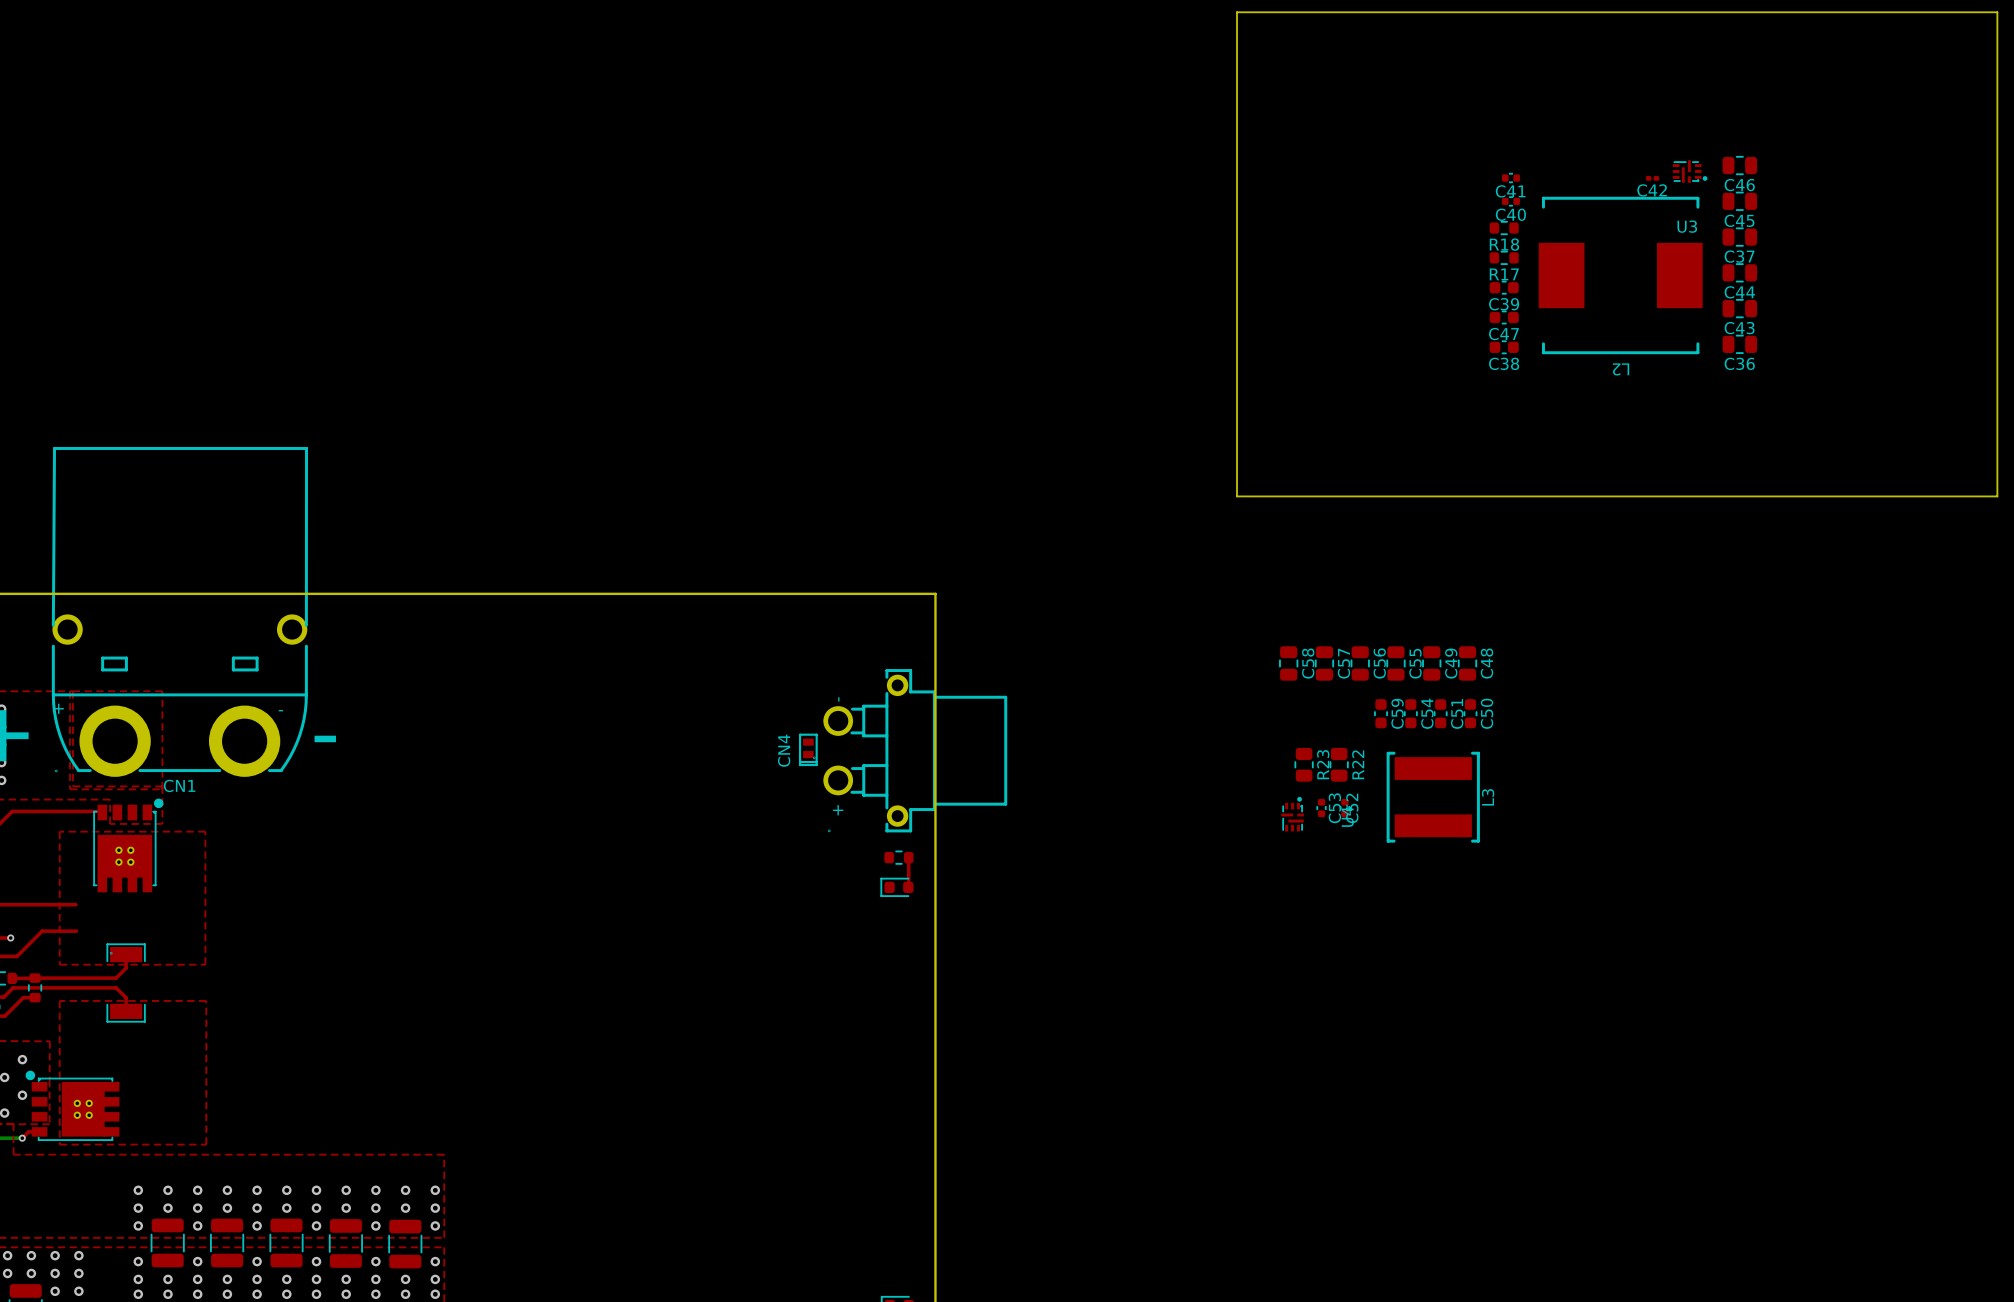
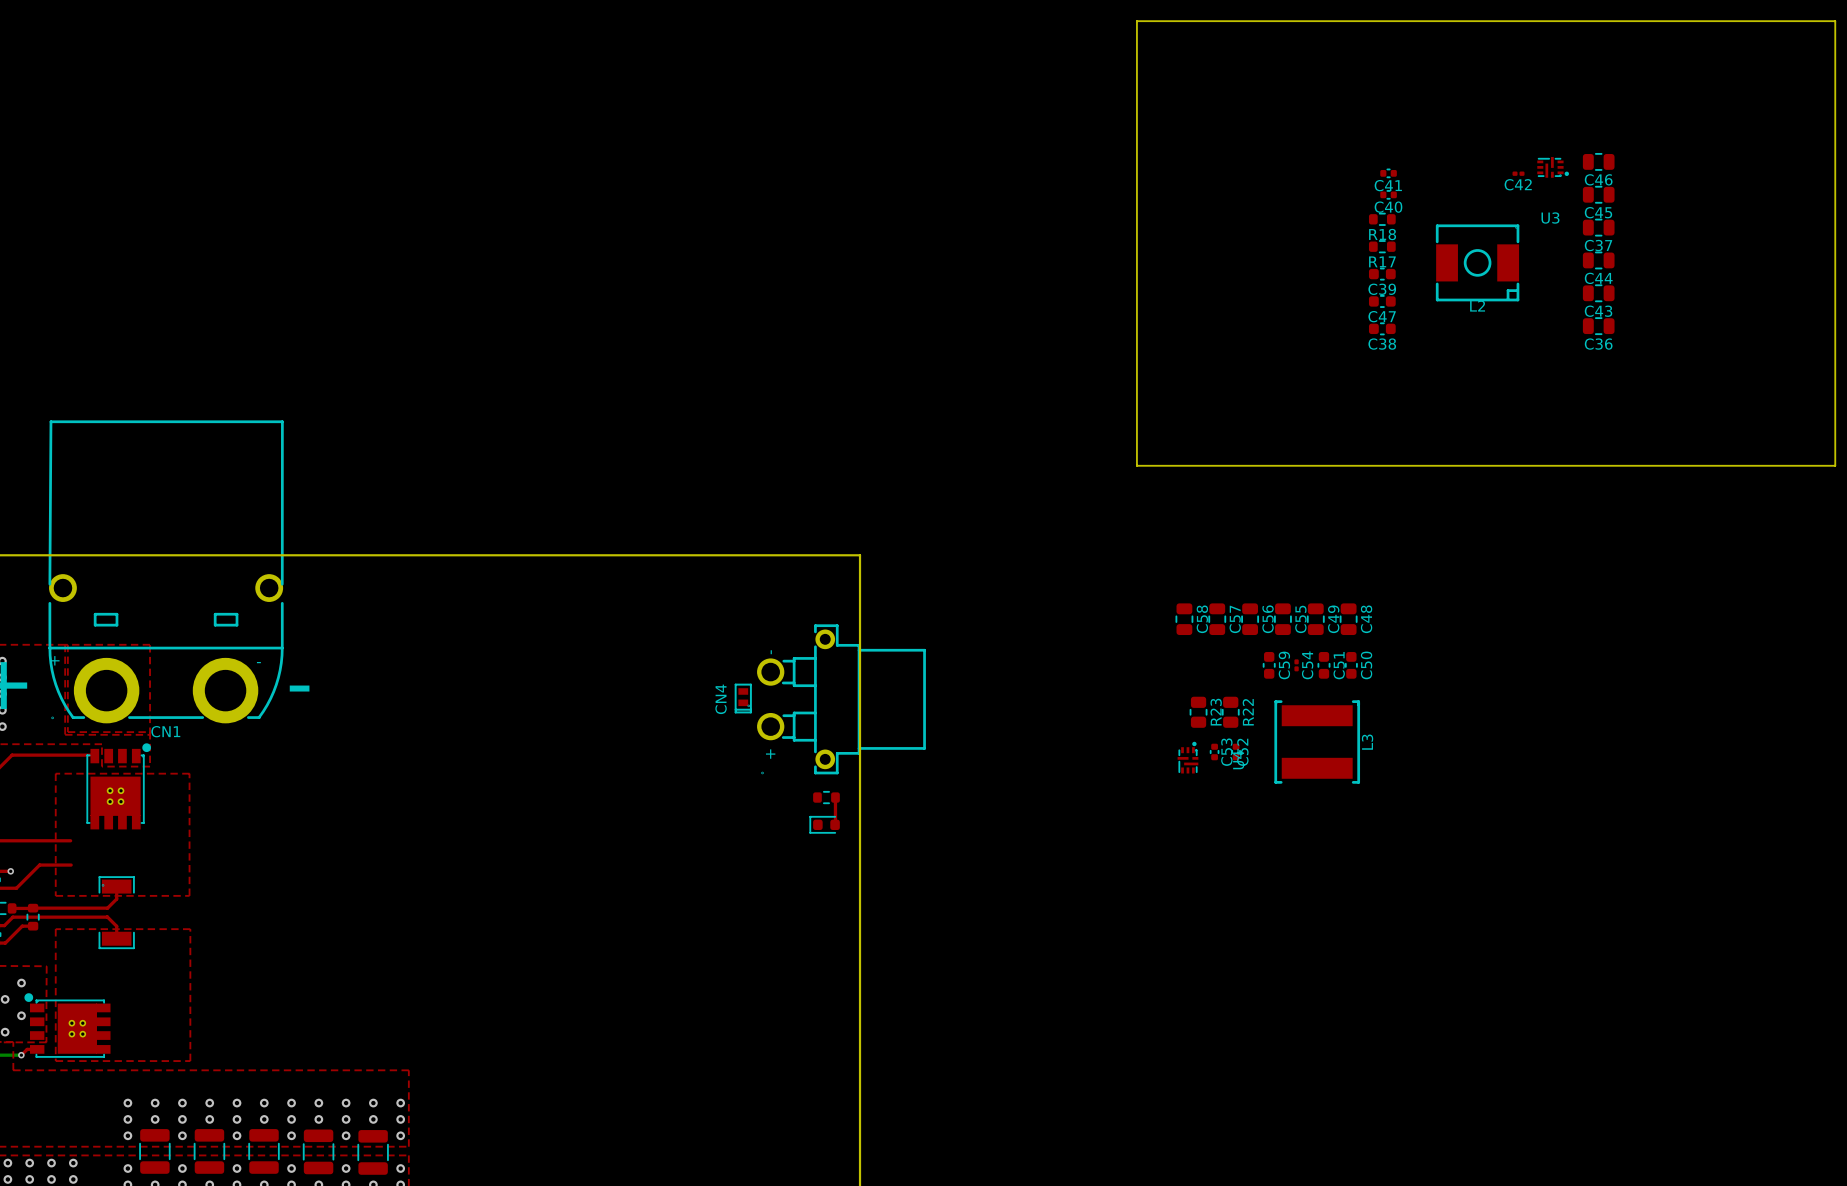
L2 footprint: [1538, 196, 1703, 355] -> [1435, 224, 1520, 302]
L2 name position: L2 (1621, 369) -> L2 (1477, 306)
C54 footprint: [1404, 699, 1418, 729] -> [1294, 659, 1299, 672]

